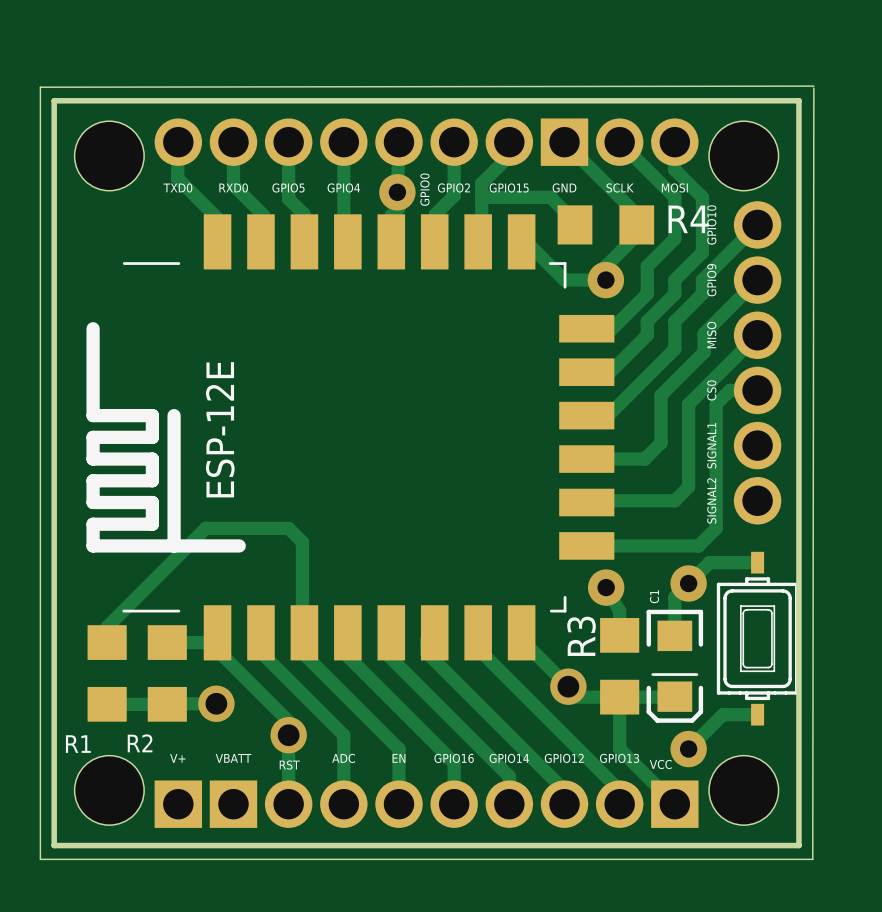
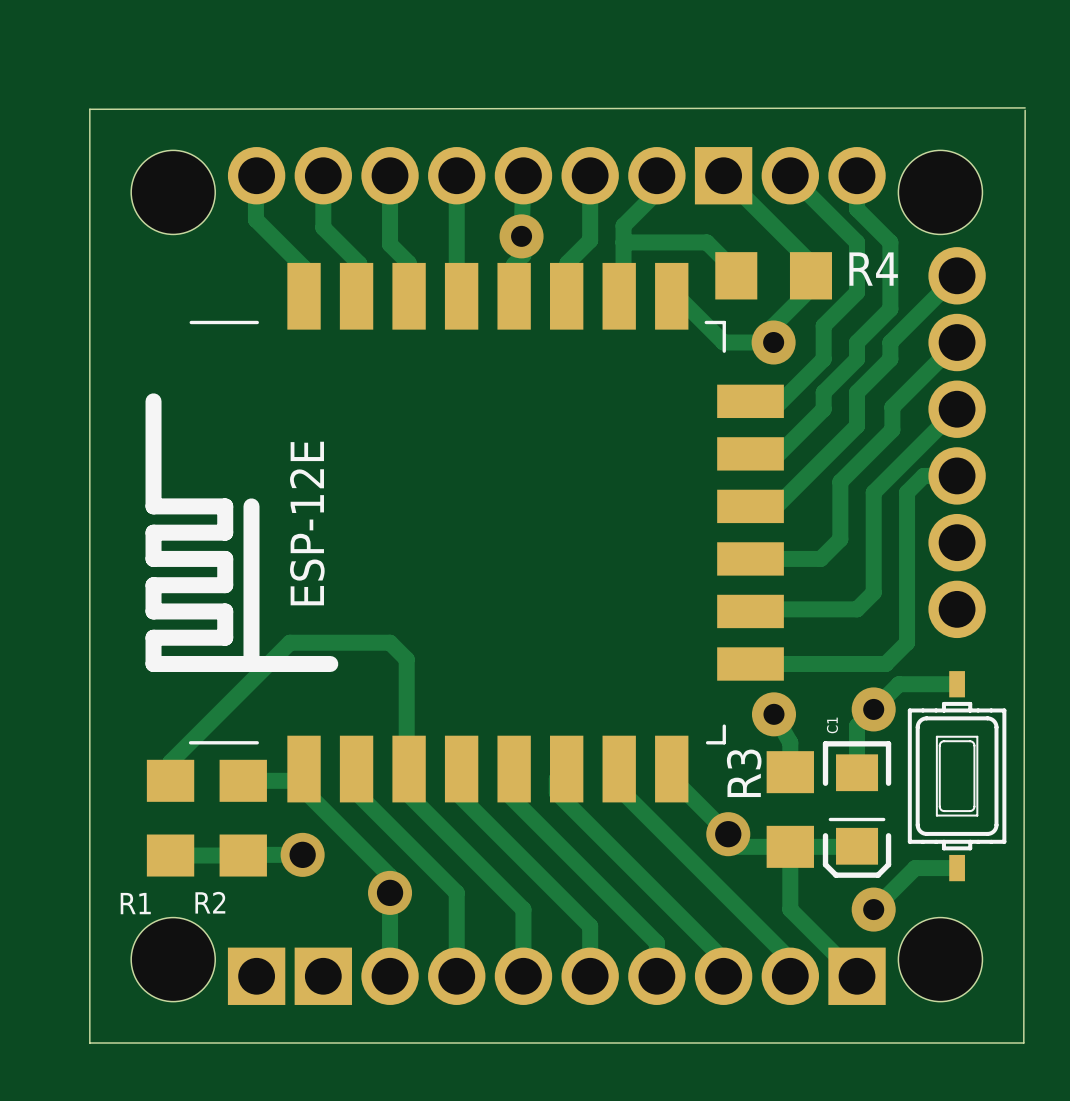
board edge: (54, 100) (798, 100) (798, 845) (54, 845) (54, 100) -> none
text: TXD0 (177, 187) -> none
text: RXD0 (233, 187) -> none
text: GPIO5 (288, 187) -> none
text: GPIO4 (343, 187) -> none
text: GPIO2 (453, 187) -> none
text: GPIO15 (509, 187) -> none
text: GND (564, 187) -> none
text: SCLK (620, 187) -> none
text: MOSI (674, 187) -> none
text: GPIO0 (424, 189) -> none
text: GPIO10 (711, 224) -> none
text: GPIO9 (711, 280) -> none
text: MISO (711, 335) -> none
text: CS0 (711, 390) -> none
text: SIGNAL1 (711, 445) -> none
text: SIGNAL2 (711, 500) -> none
text: V+ (177, 758) -> none
text: VBATT (233, 758) -> none
text: ADC (343, 758) -> none
text: EN (398, 758) -> none
text: GPIO16 (454, 758) -> none
text: GPIO14 (509, 758) -> none
text: GPIO12 (564, 758) -> none
text: GPIO13 (619, 758) -> none
text: VCC (660, 764) -> none
text: RST (289, 765) -> none

